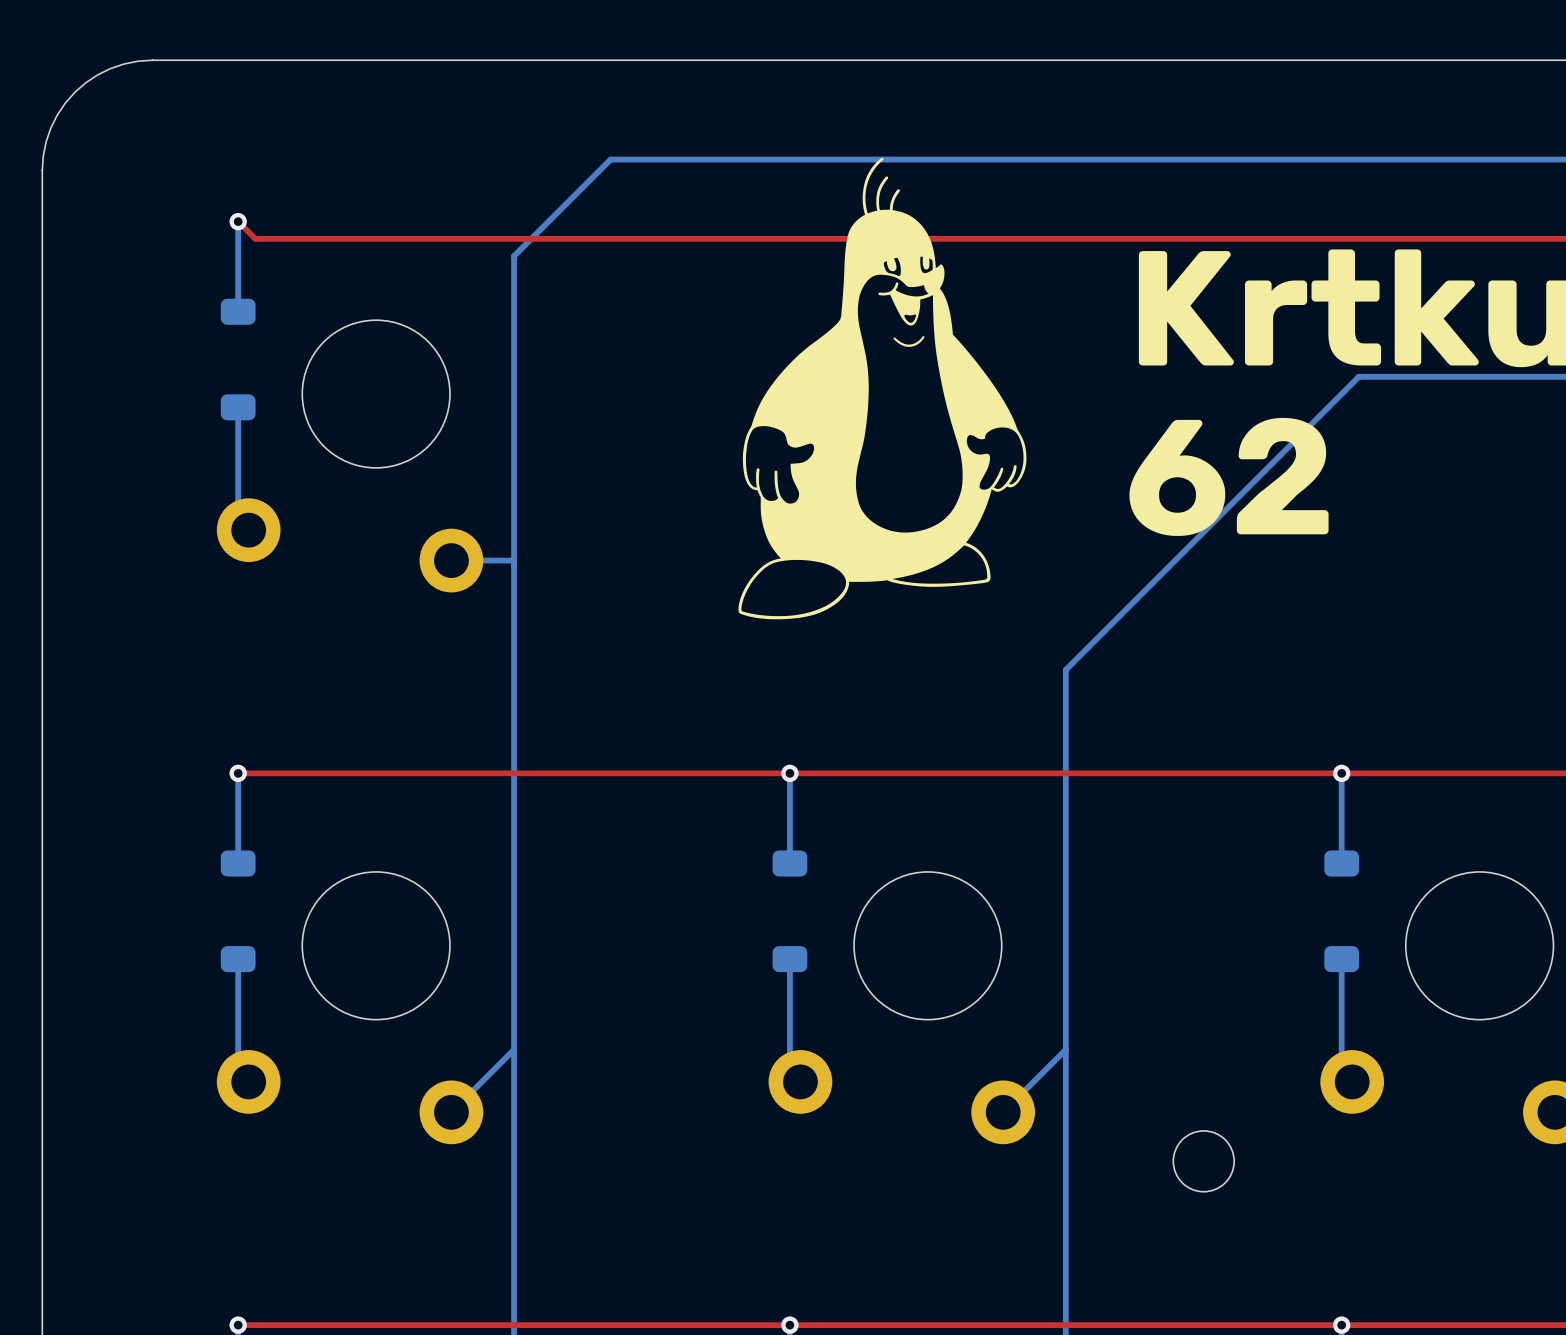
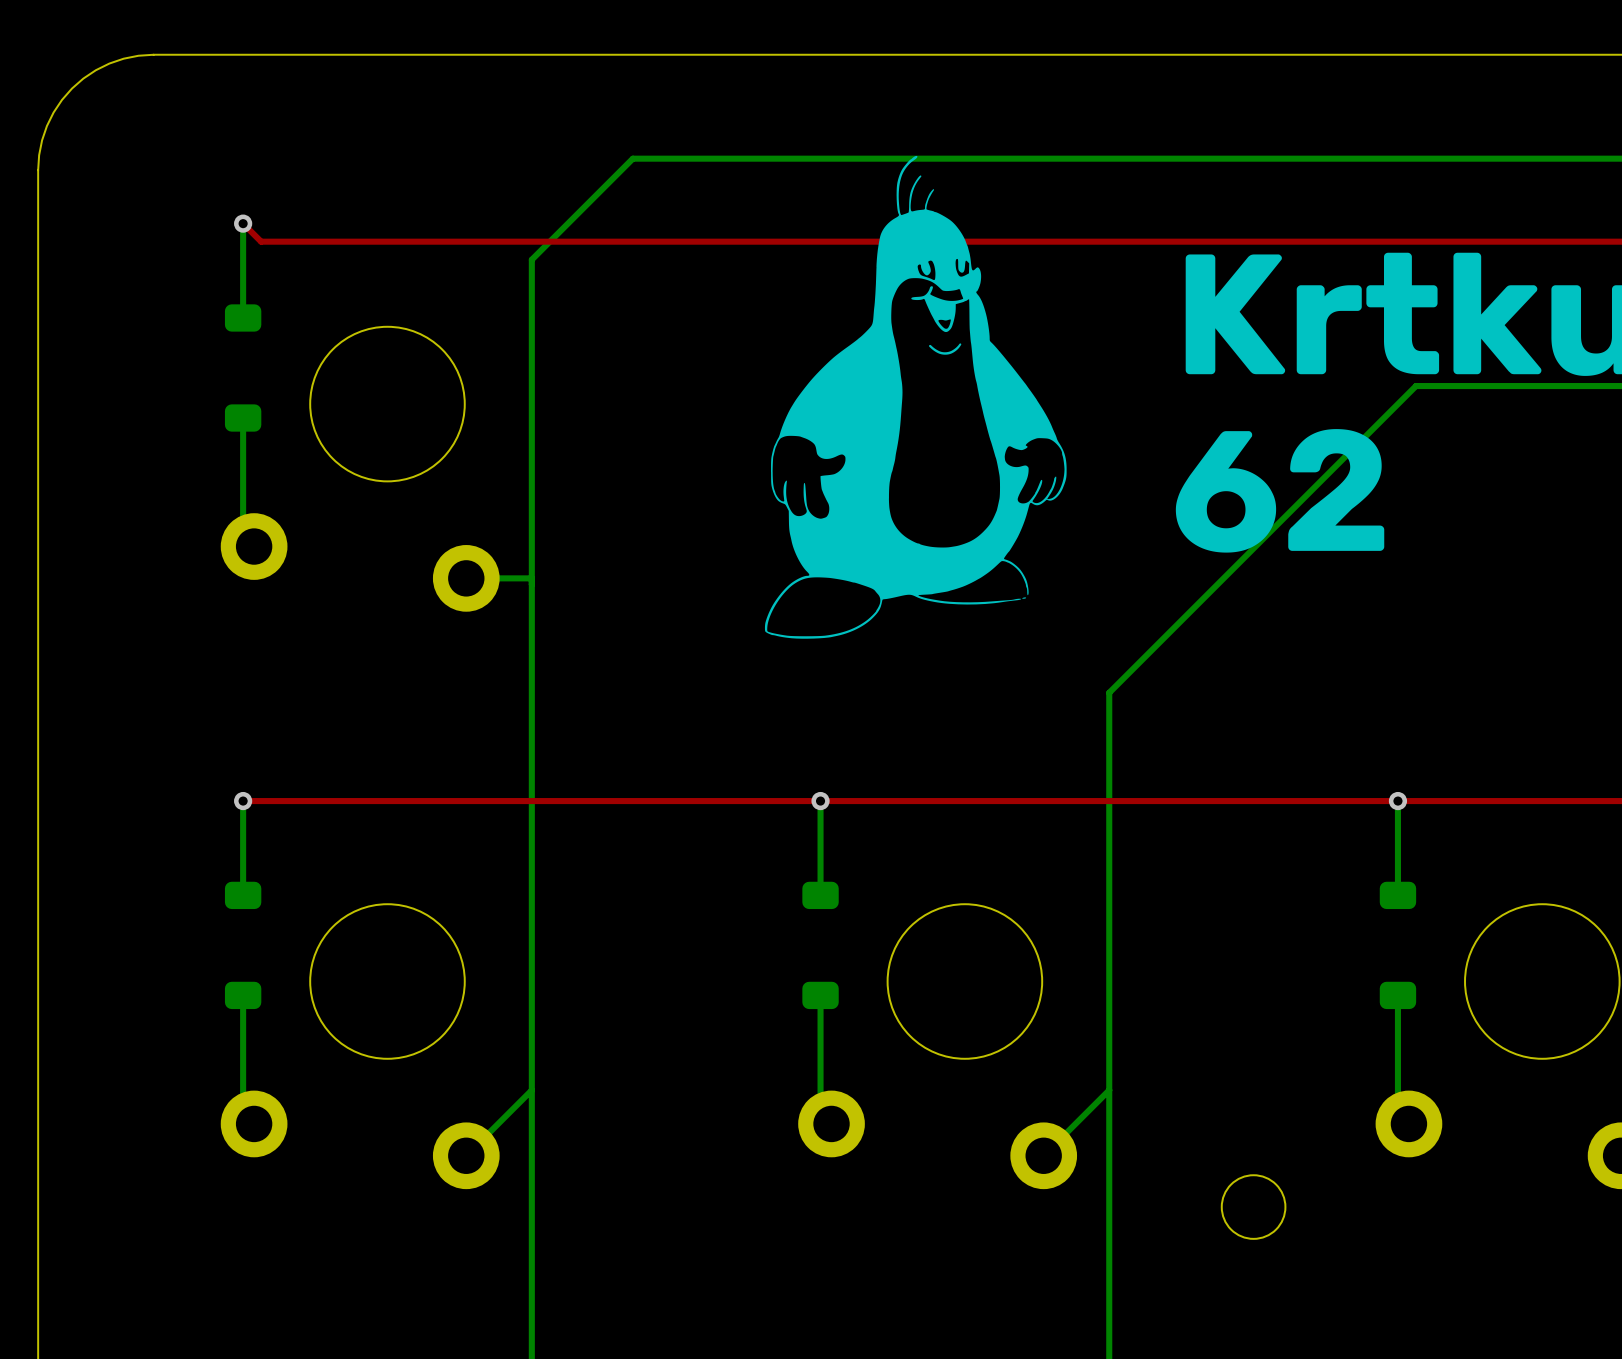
drawing shape: [738, 157, 1027, 620] -> [764, 155, 1067, 639]
drawing: none -> [1022, 597, 1027, 599]

